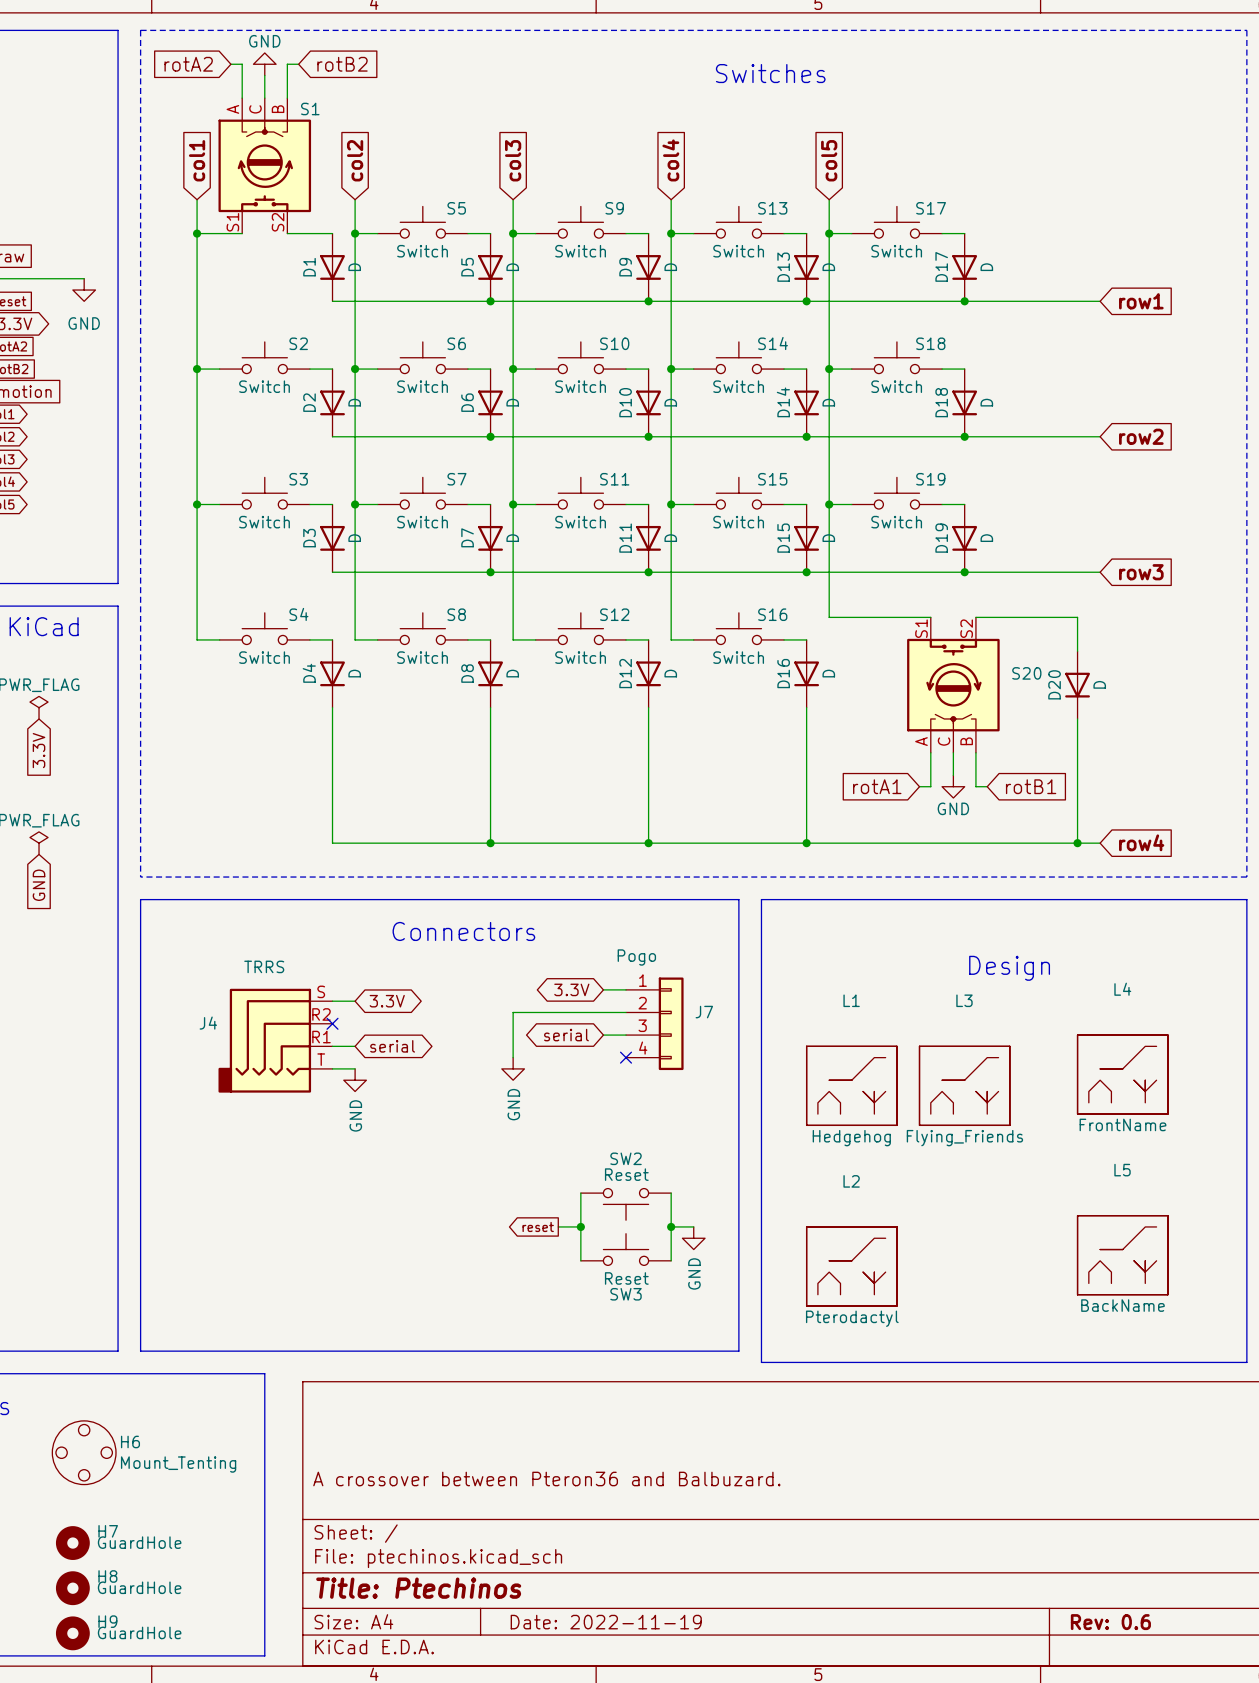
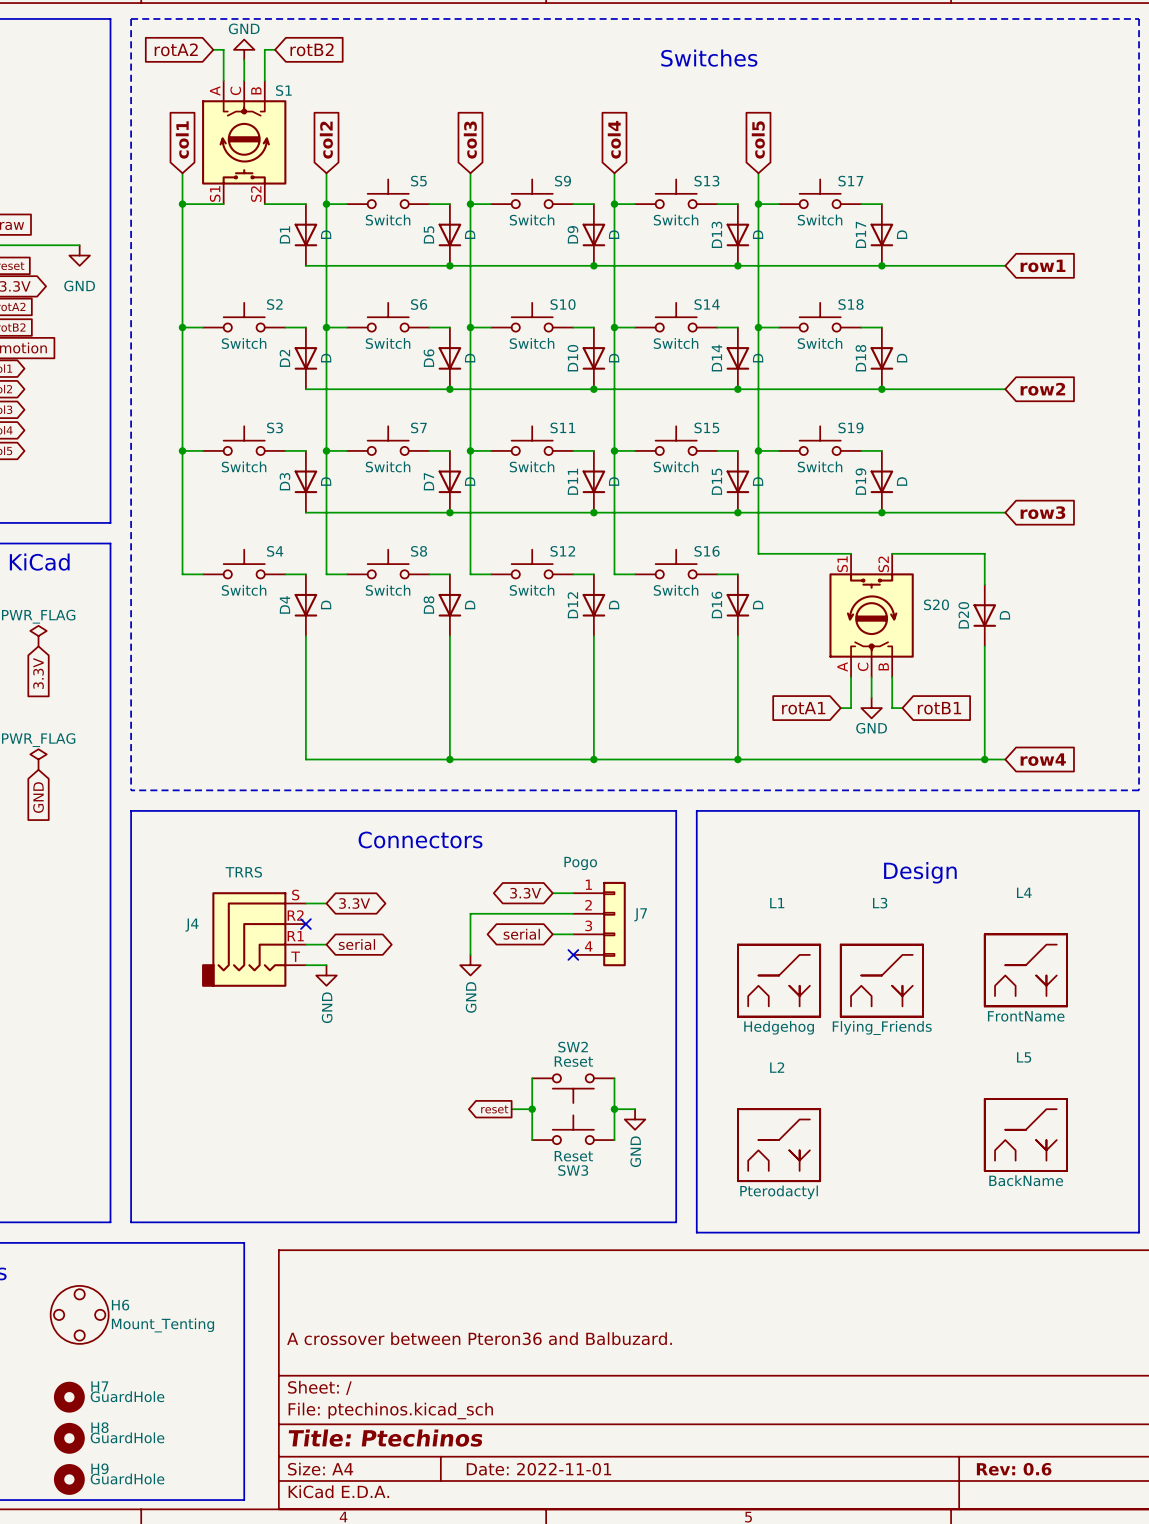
title block: Date: 2022-11-19 (606, 1622) -> Date: 2022-11-01 (538, 1469)

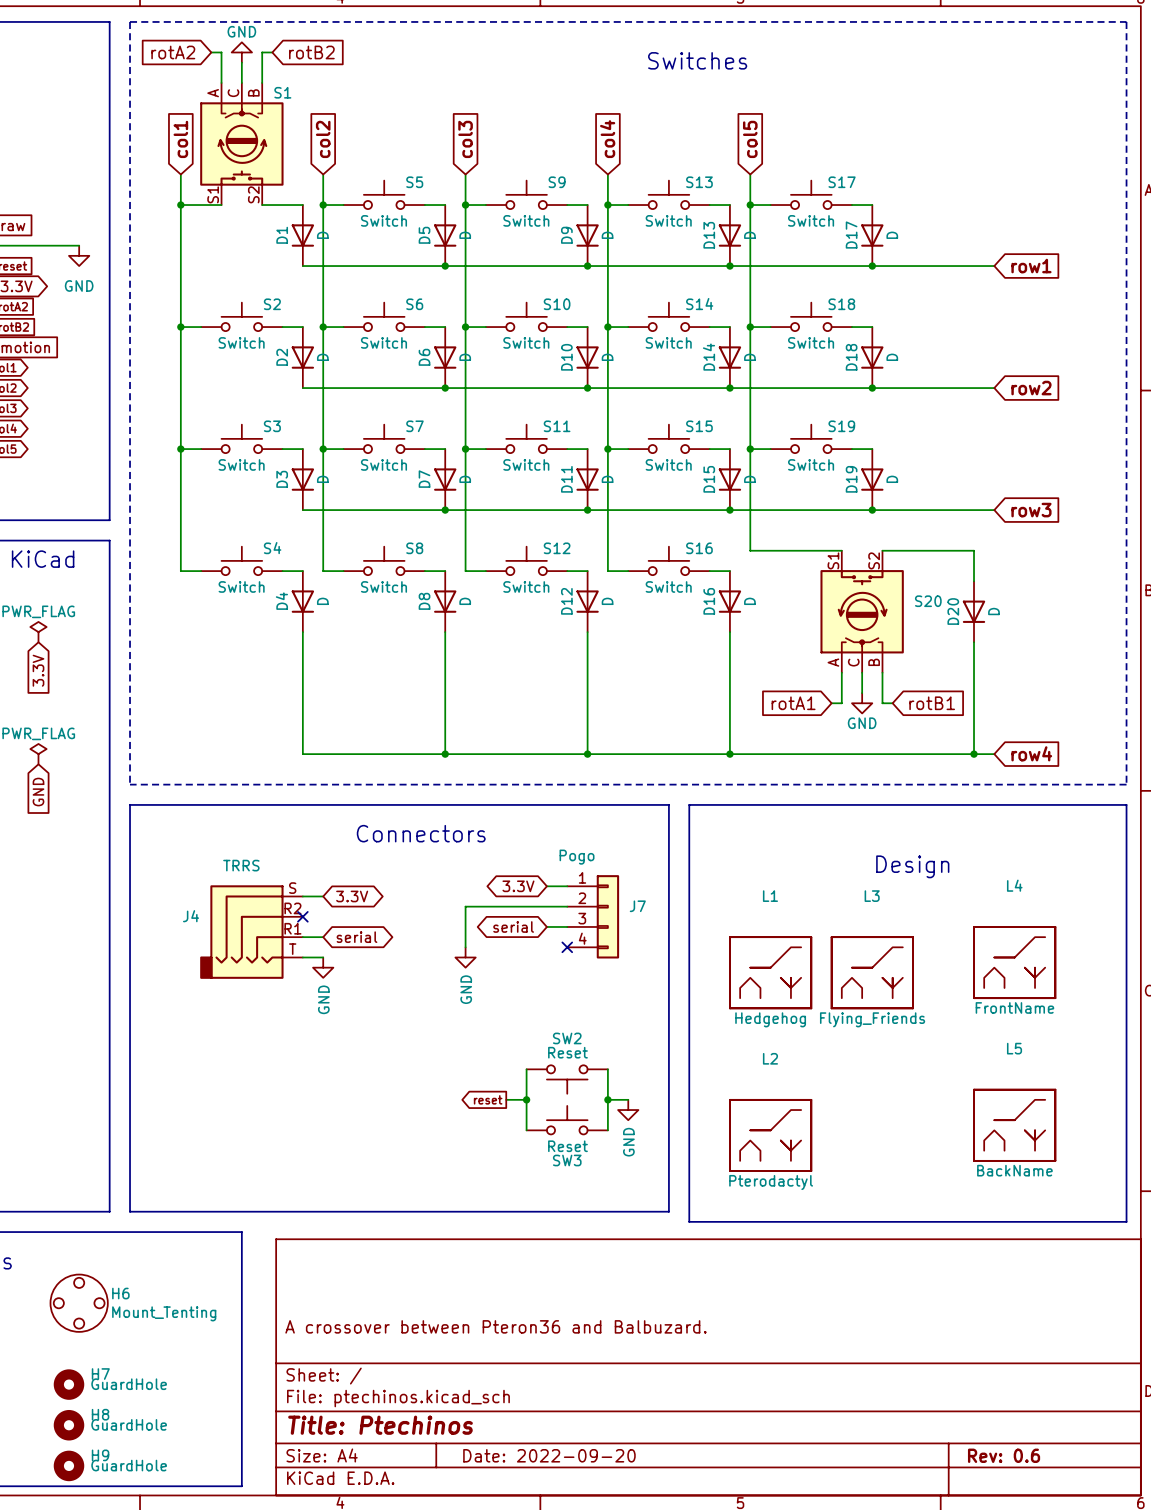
title block: Date: 2022-11-01 (538, 1469) -> Date: 2022-09-20 (549, 1455)

